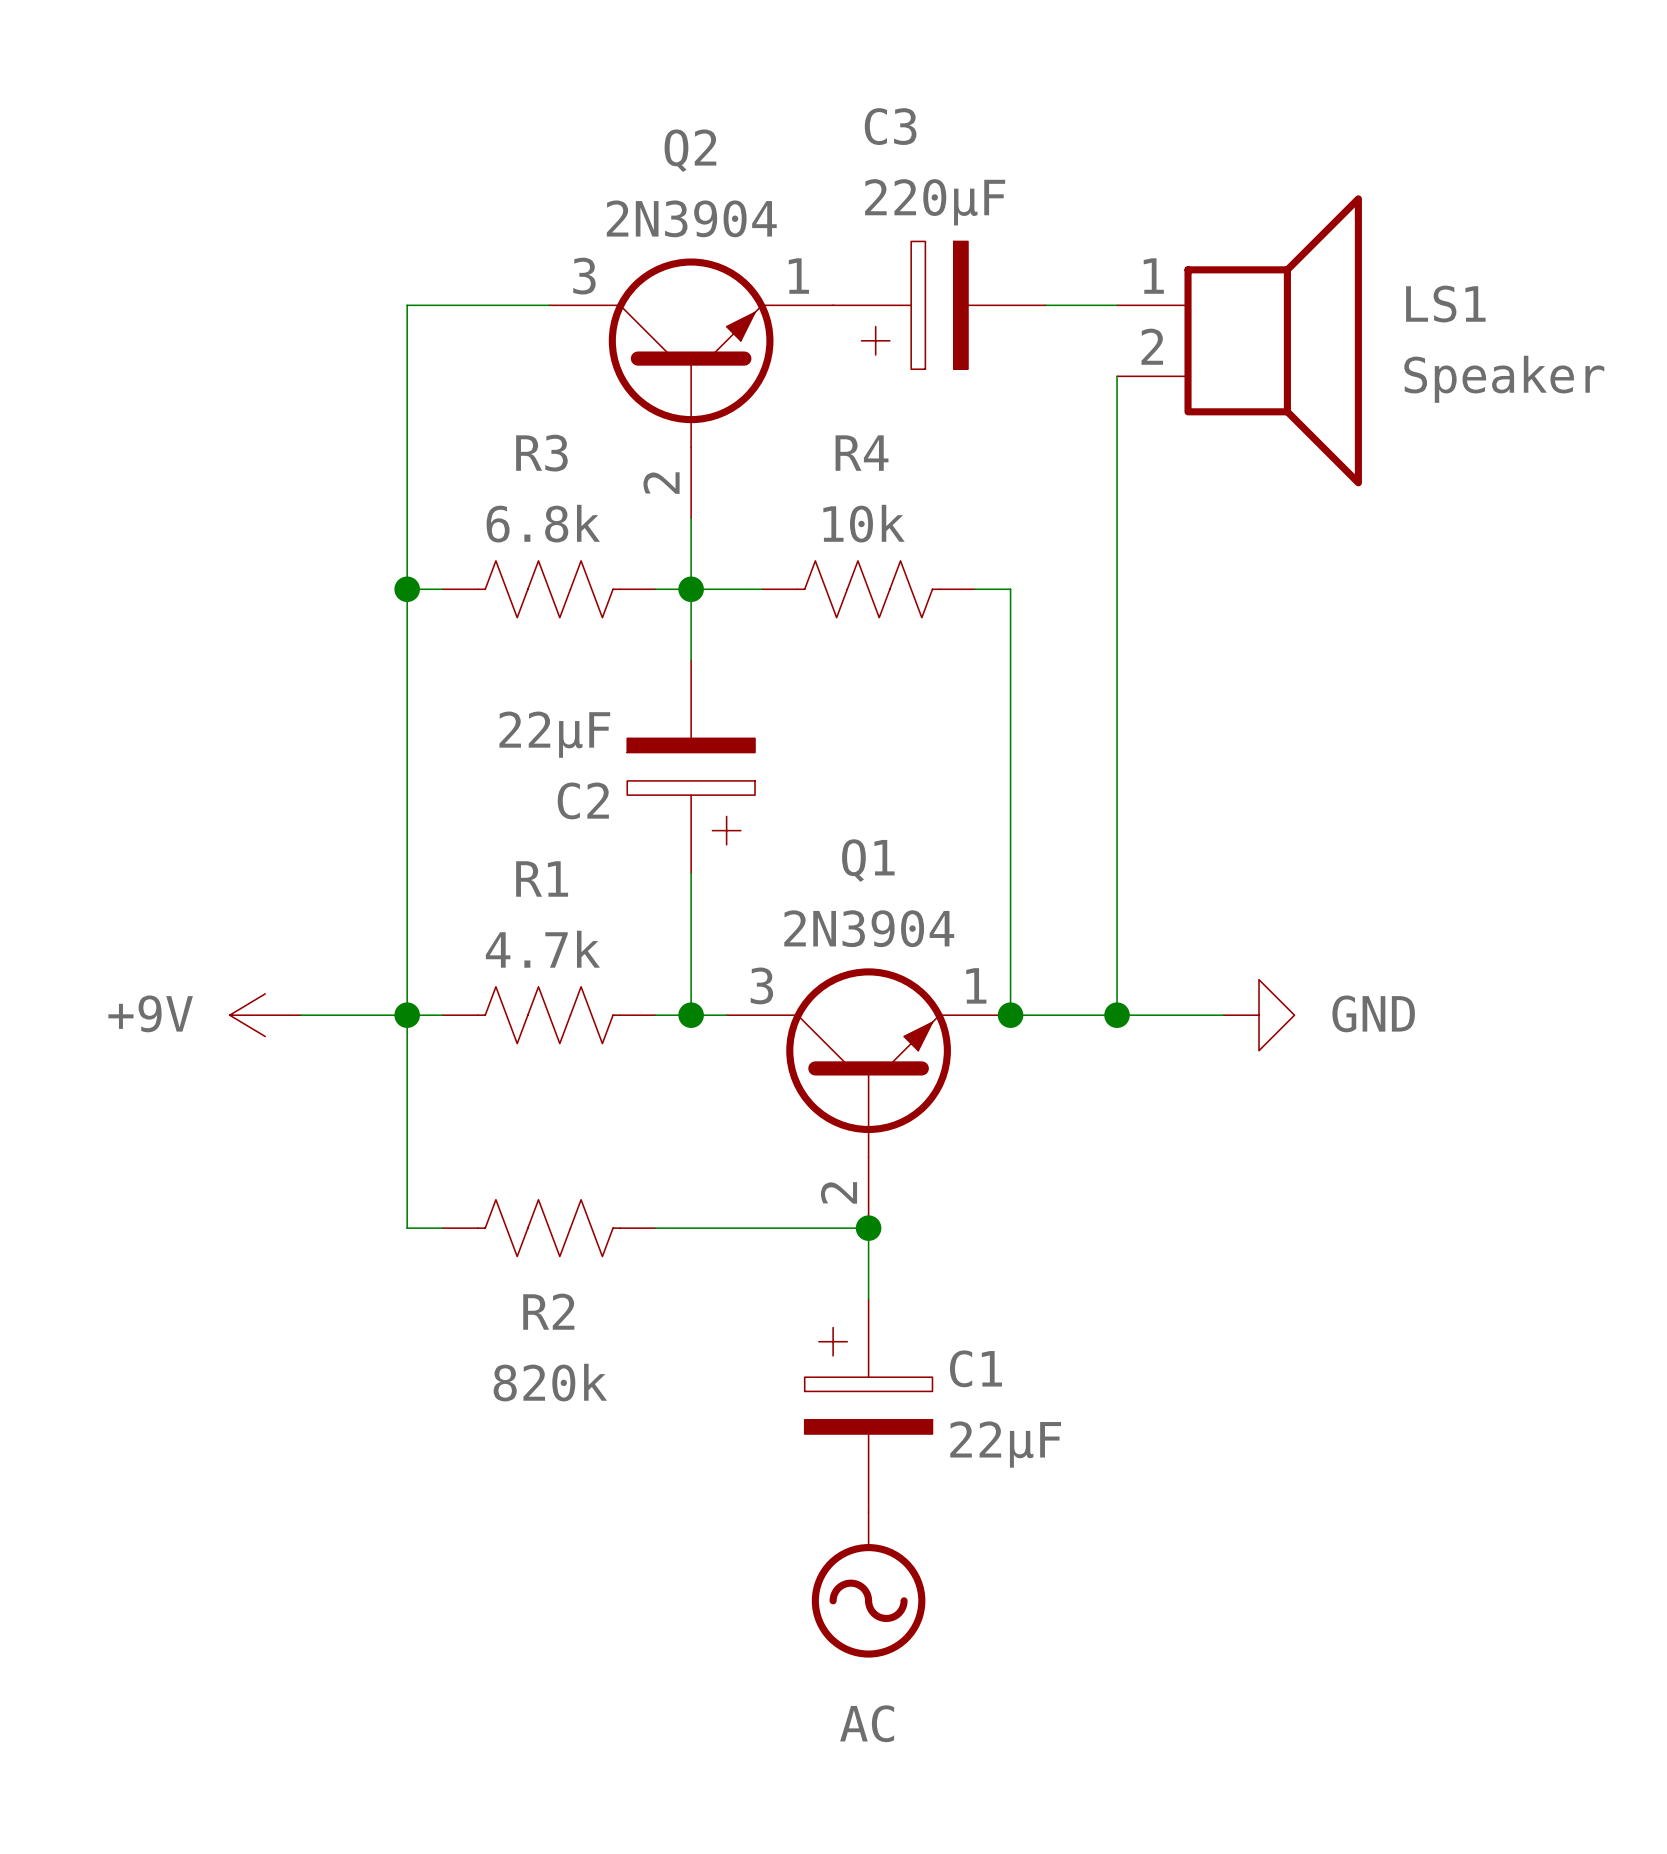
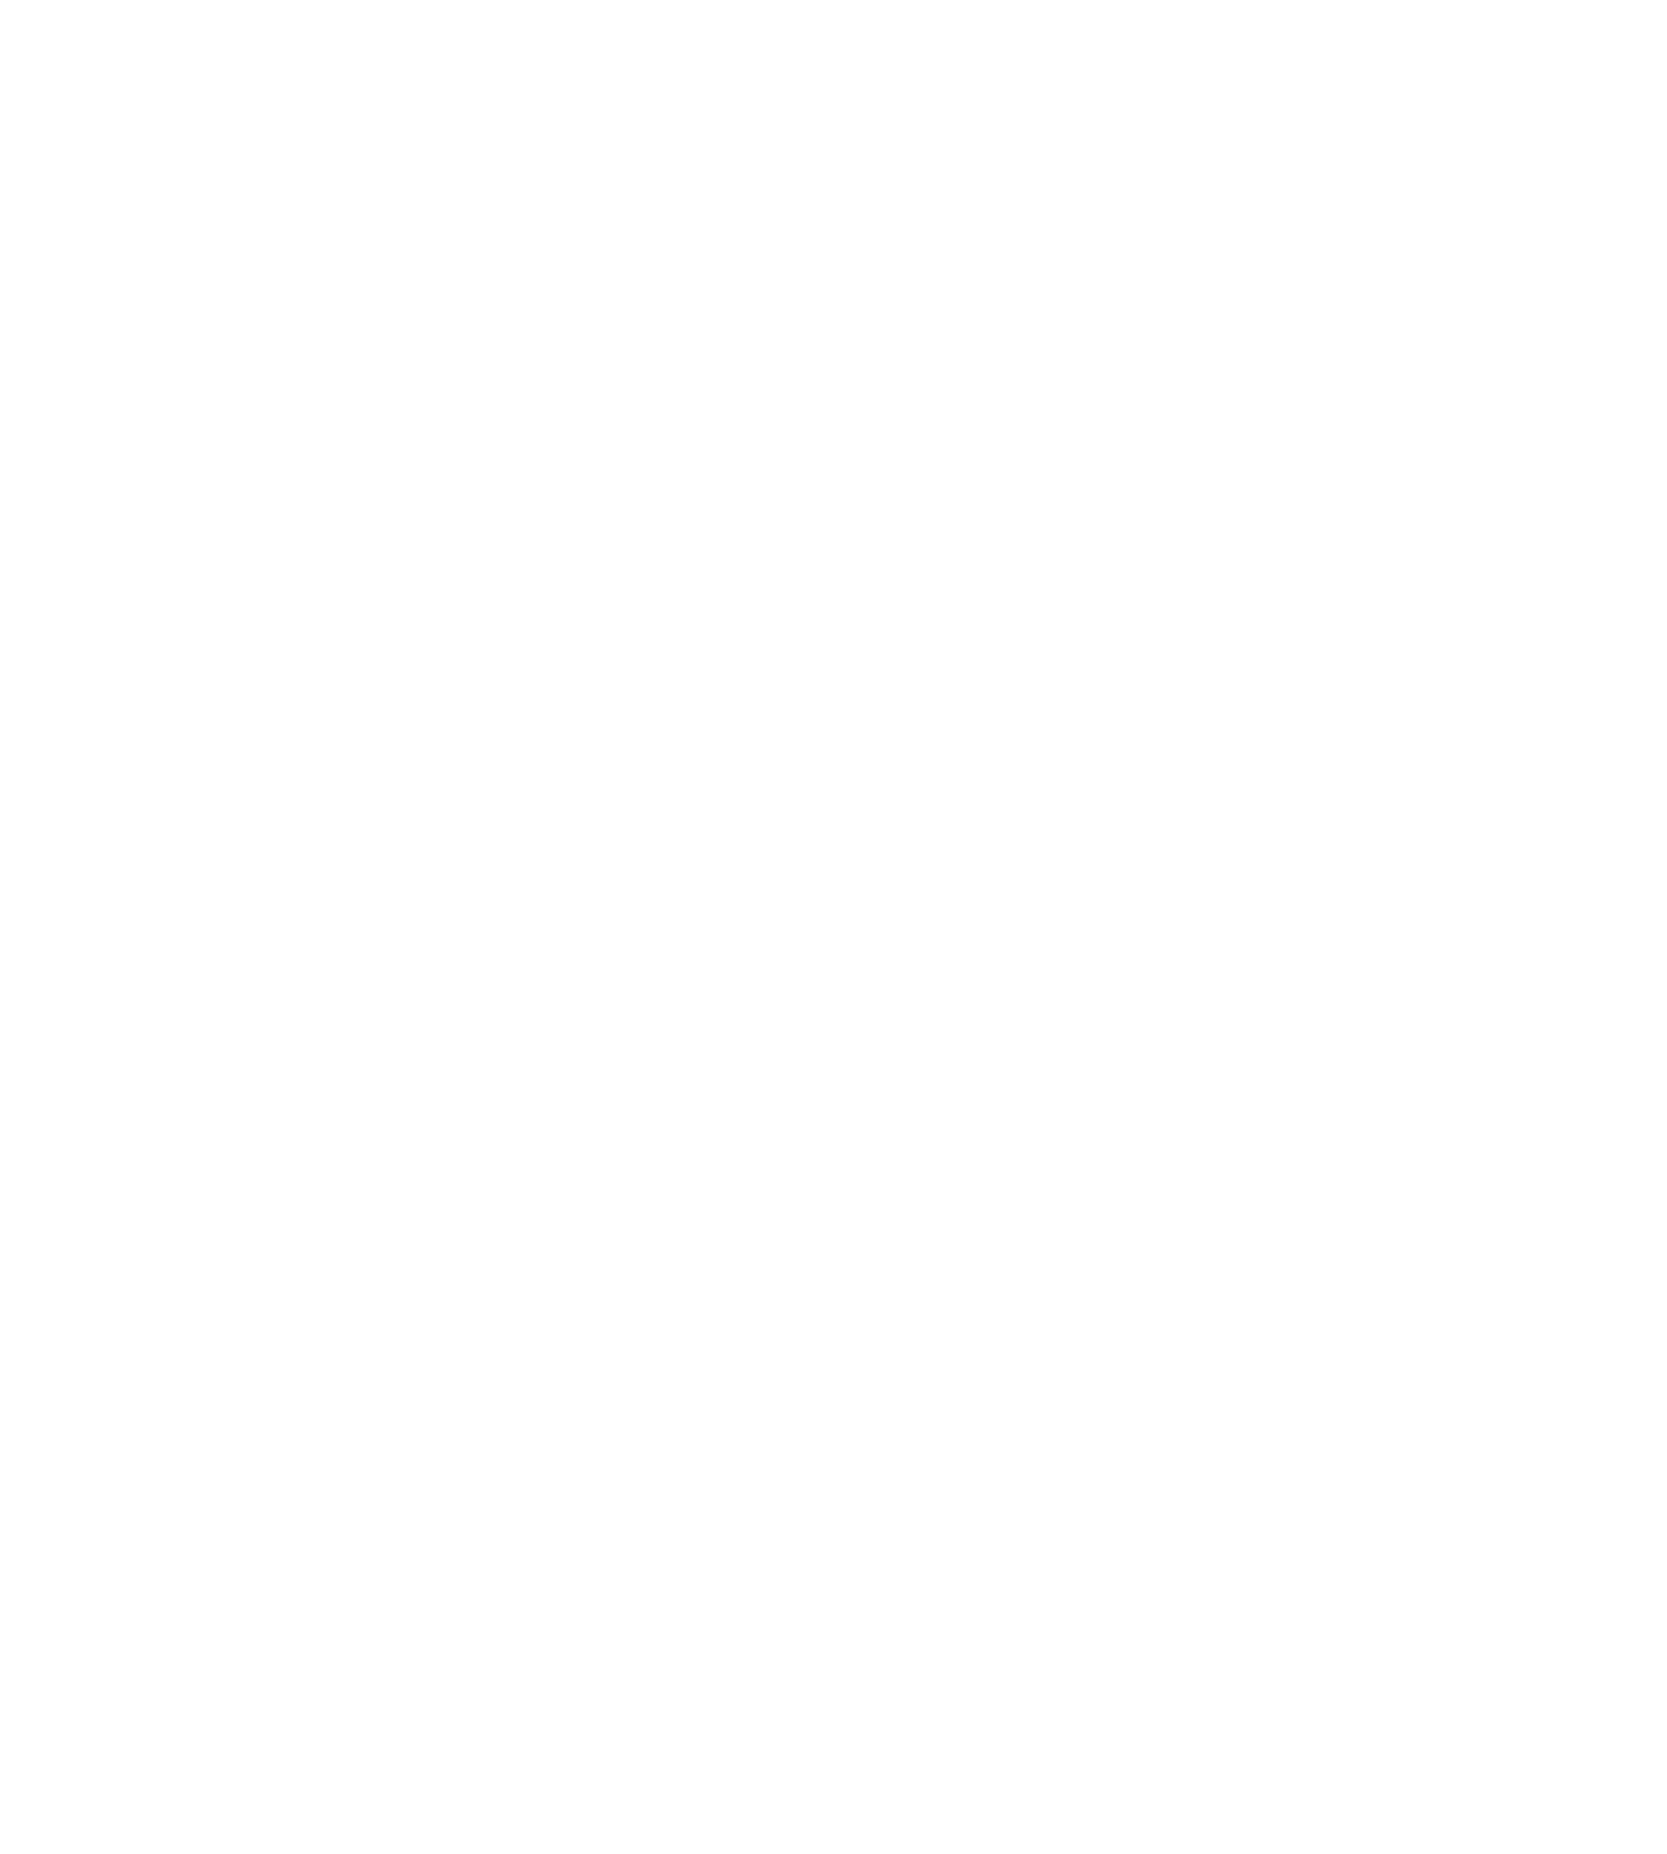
wire: (549, 305) (407, 305) (407, 1228) (442, 1228) -> none
C3: 220μF (939, 305) -> none
wire: (1046, 305) (1117, 305) -> none
LS1: Speaker (1239, 340) -> none
wire: (1117, 376) (1117, 1015) -> none
Q2: 2N3904 (691, 388) -> none
wire: (691, 518) (691, 660) -> none
wire: (407, 589) (442, 589) -> none
junction: (407, 589) -> none
R3: 6.8k (549, 589) -> none
wire: (655, 589) (762, 589) -> none
junction: (691, 589) -> none
R4: 10k (868, 589) -> none
wire: (975, 589) (1010, 589) (1010, 1015) (1223, 1015) -> none
C2: 22μF (691, 766) -> none
wire: (691, 873) (691, 1015) -> none
power symbol: +9V (265, 1015) -> none
wire: (300, 1015) (442, 1015) -> none
junction: (407, 1015) -> none
R1: 4.7k (549, 1015) -> none
wire: (655, 1015) (726, 1015) -> none
junction: (691, 1015) -> none
junction: (1010, 1015) -> none
junction: (1117, 1015) -> none
power symbol: GND (1259, 1015) -> none
Q1: 2N3904 (868, 1098) -> none
R2: 820k (549, 1228) -> none
wire: (655, 1228) (868, 1228) (868, 1299) -> none
junction: (868, 1228) -> none
C1: 22μF (868, 1405) -> none
power symbol: AC (868, 1584) -> none

